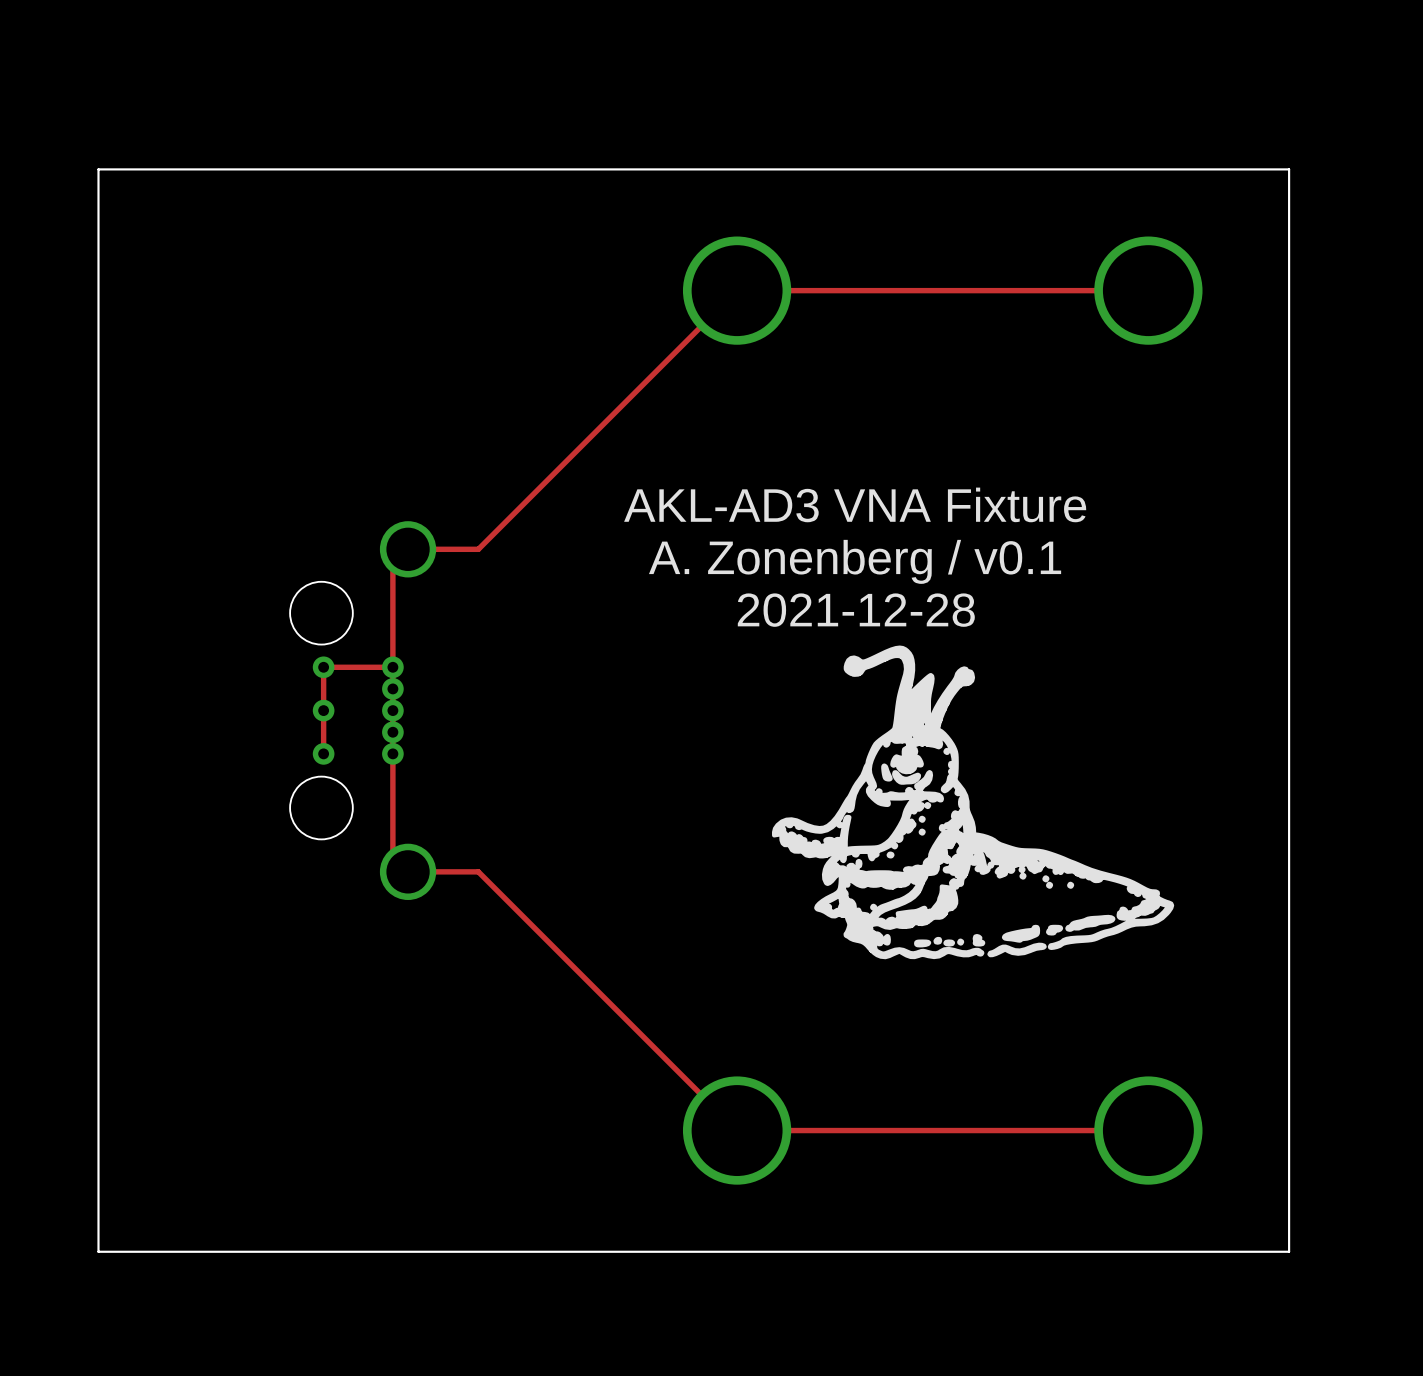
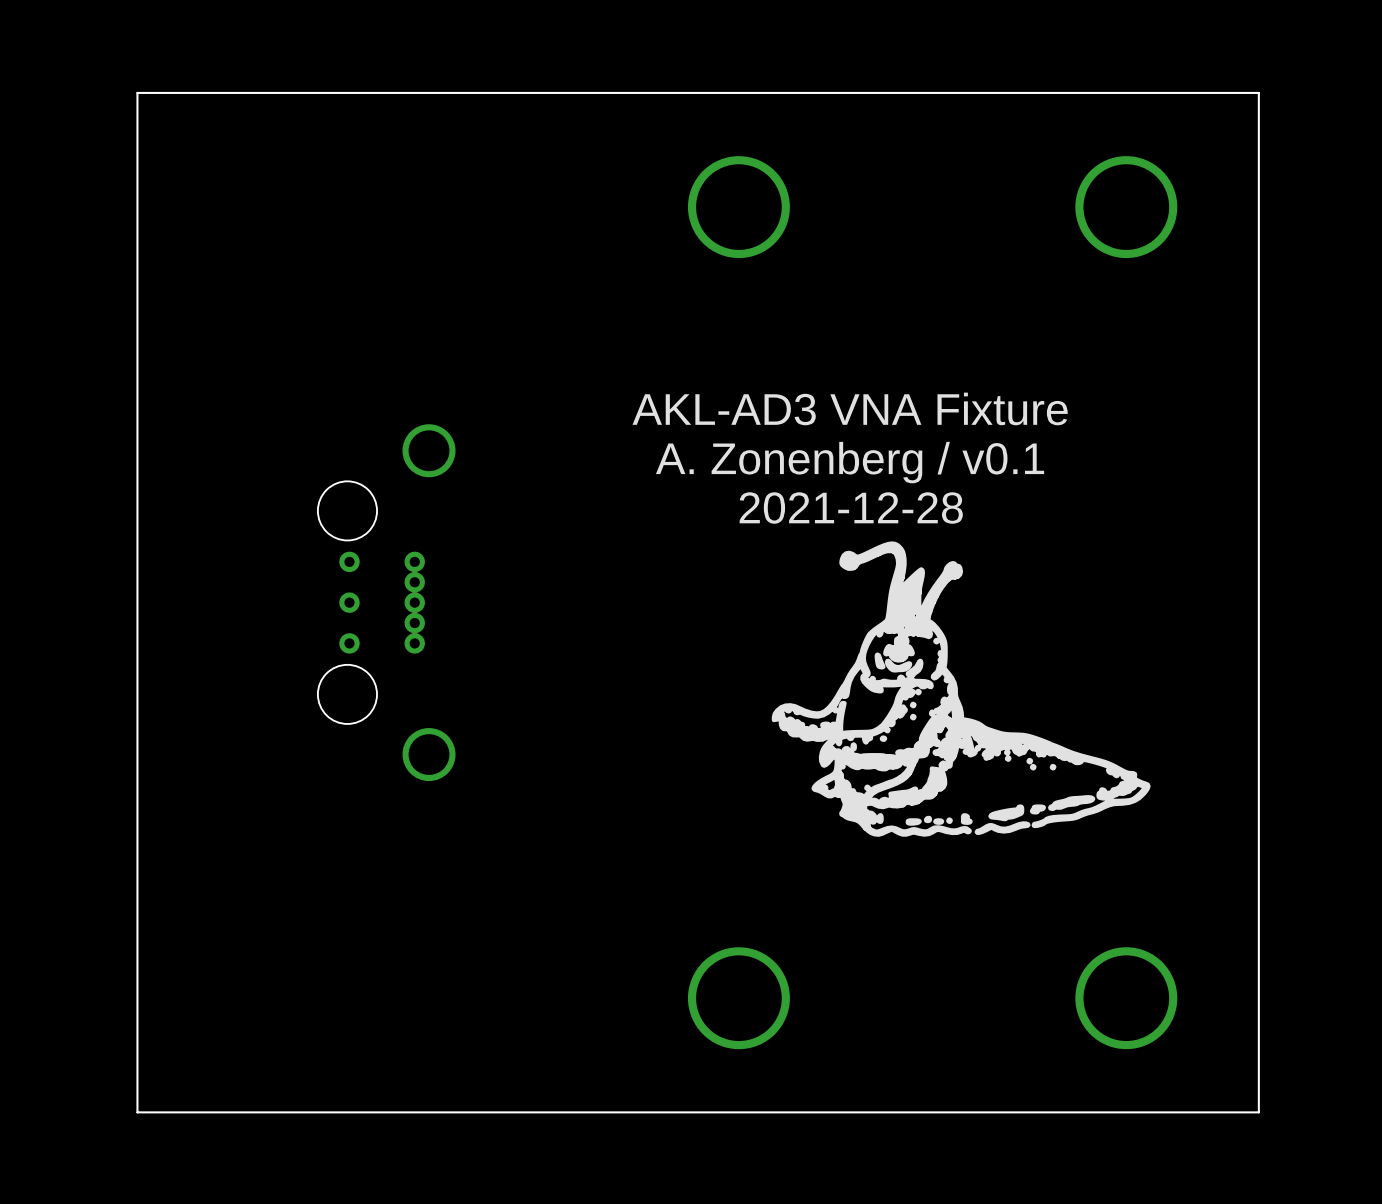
track: (1148, 290) (737, 290) (478, 549) (408, 549) (392, 564) (392, 667) (323, 667) (323, 753) -> none
track: (392, 753) (392, 856) (408, 871) (478, 871) (737, 1130) (1148, 1130) -> none

